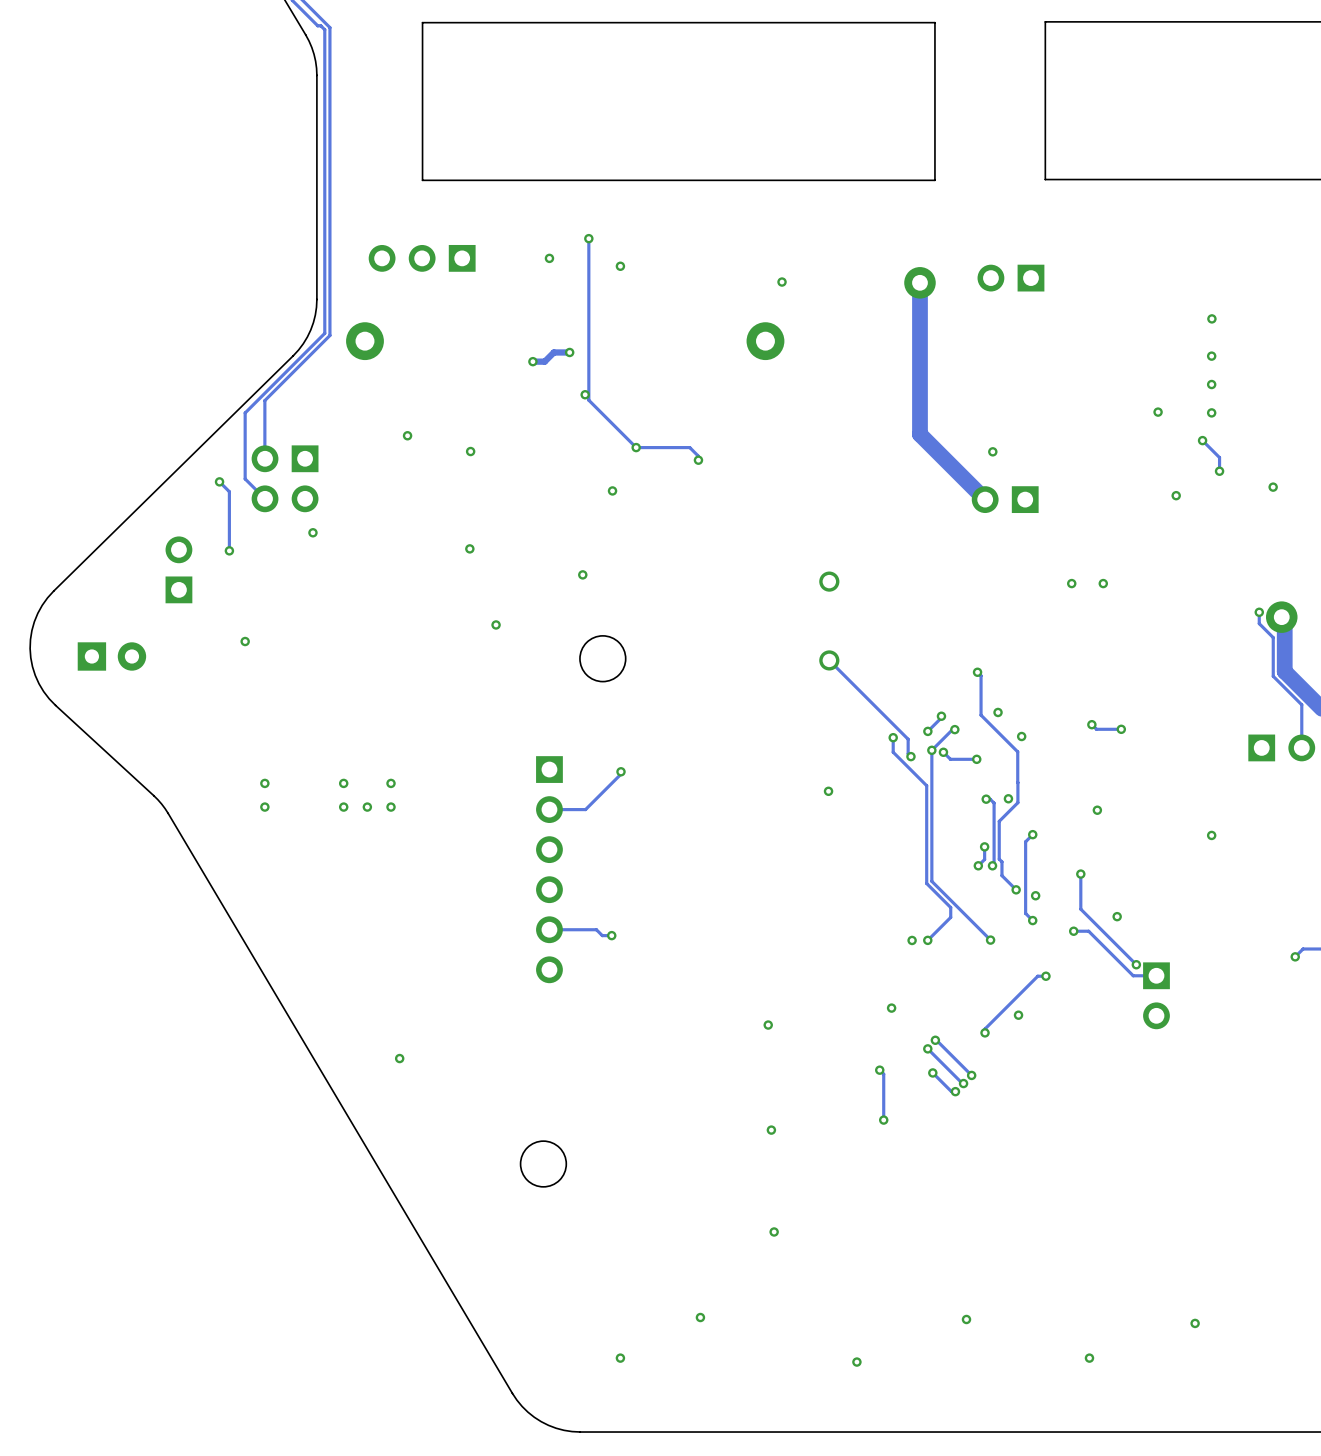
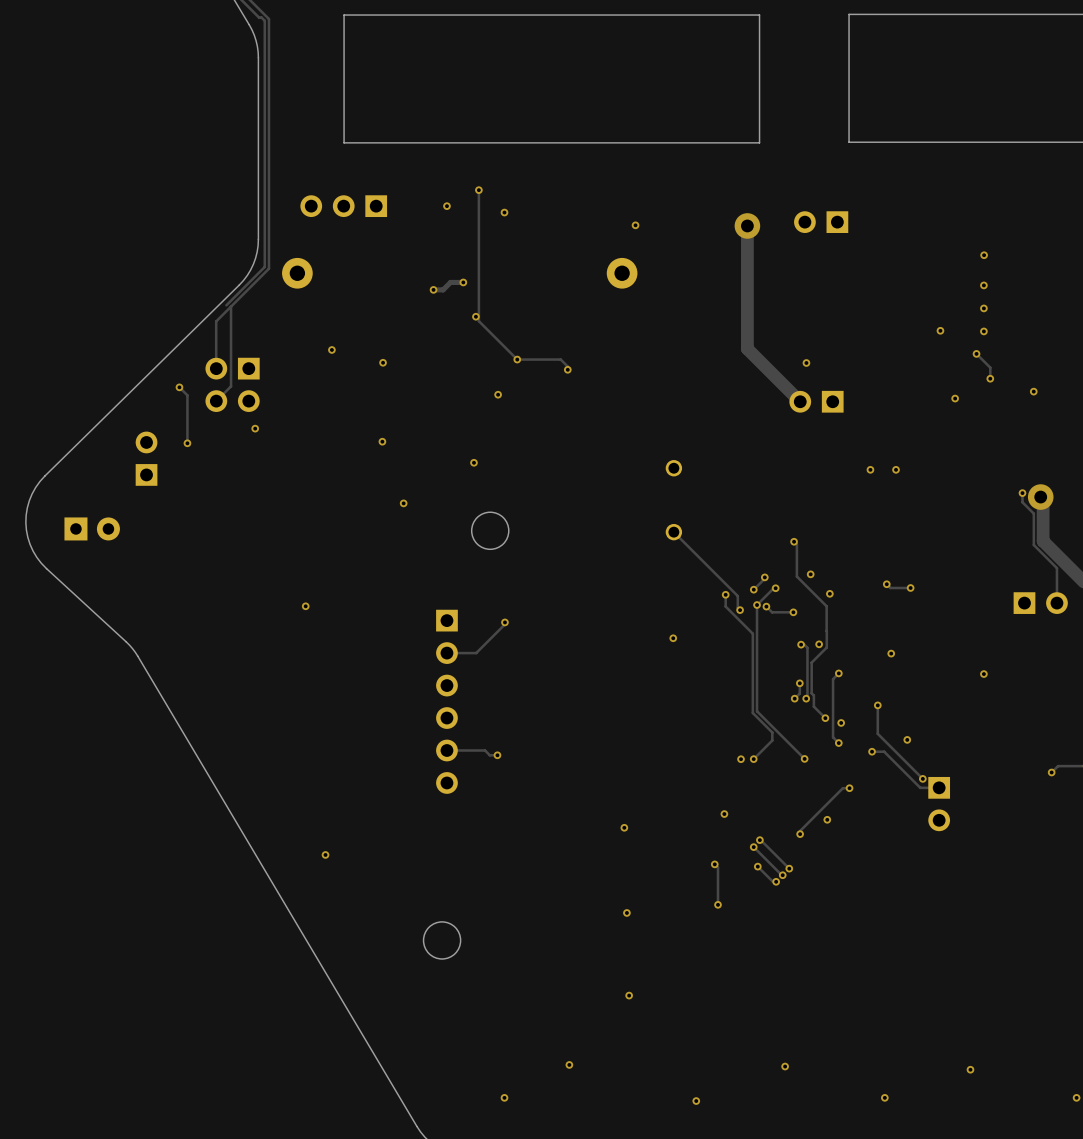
track: (277, 380) (245, 412) (245, 478) (265, 498) -> (231, 306) (231, 386) (216, 401)
via: (245, 641) -> none
via: none -> (305, 606)
via: (264, 783) -> none
via: (343, 783) -> none
via: (391, 783) -> none
via: (264, 807) -> none
via: (343, 807) -> none
via: (367, 807) -> none
via: (391, 807) -> none

